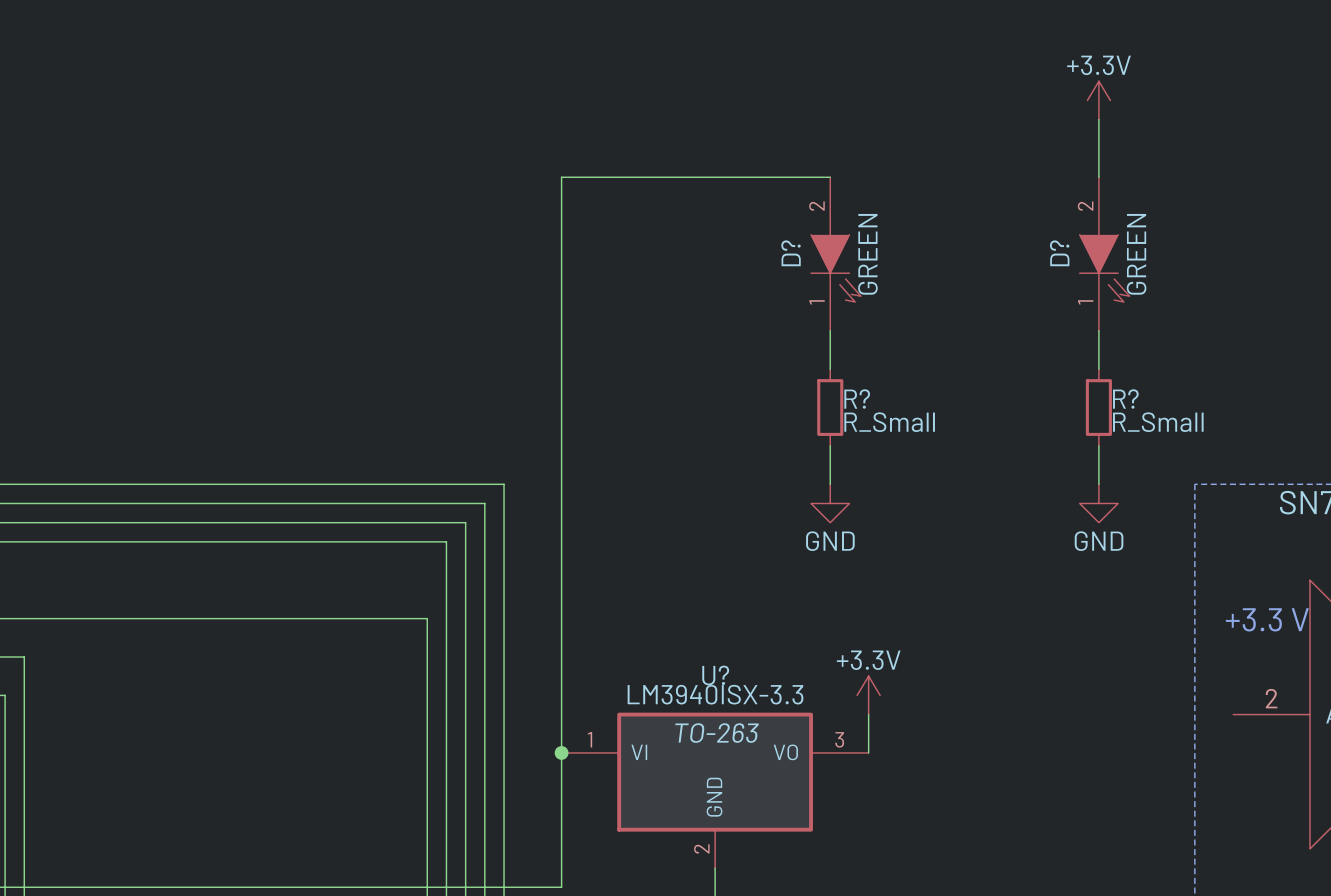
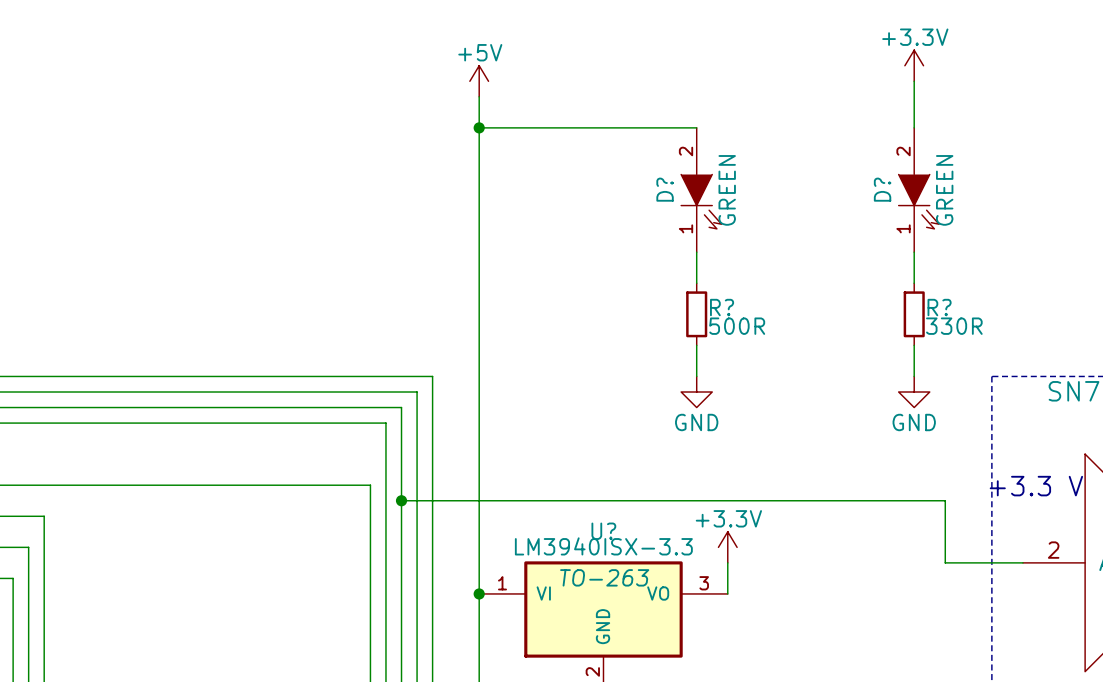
power symbol: none -> +5V (479, 81)
wire: none -> (479, 96) (479, 127)
junction: none -> (479, 127)
R? value: R_Small (889, 422) -> 500R (737, 326)
R? value: R_Small (1158, 422) -> 330R (954, 326)
wire: none -> (401, 500) (945, 500) (945, 562) (1022, 562)
junction: none -> (401, 500)

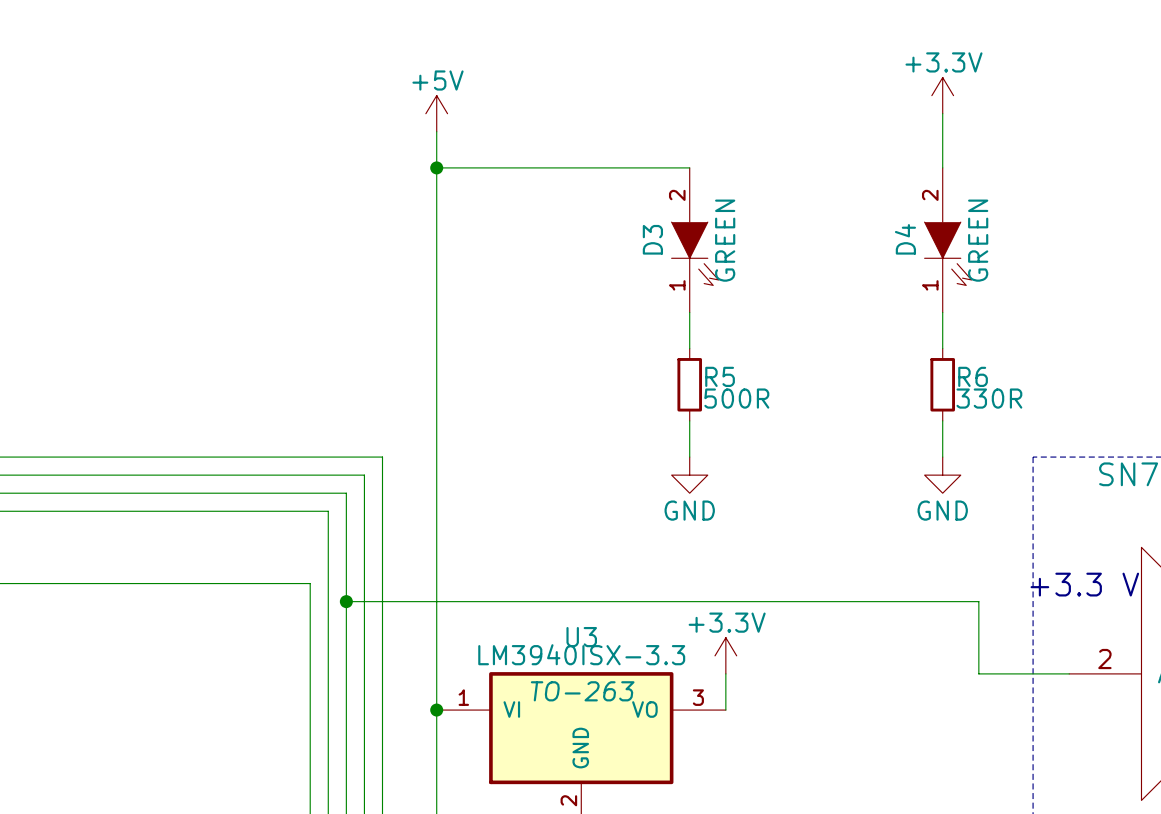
D? name: D? (665, 189) -> D3 (652, 239)
D? name: D? (882, 189) -> D4 (905, 239)
R? name: R? (722, 307) -> R5 (720, 376)
R? name: R? (939, 307) -> R6 (973, 376)
U? name: U? (603, 531) -> U3 (581, 637)

